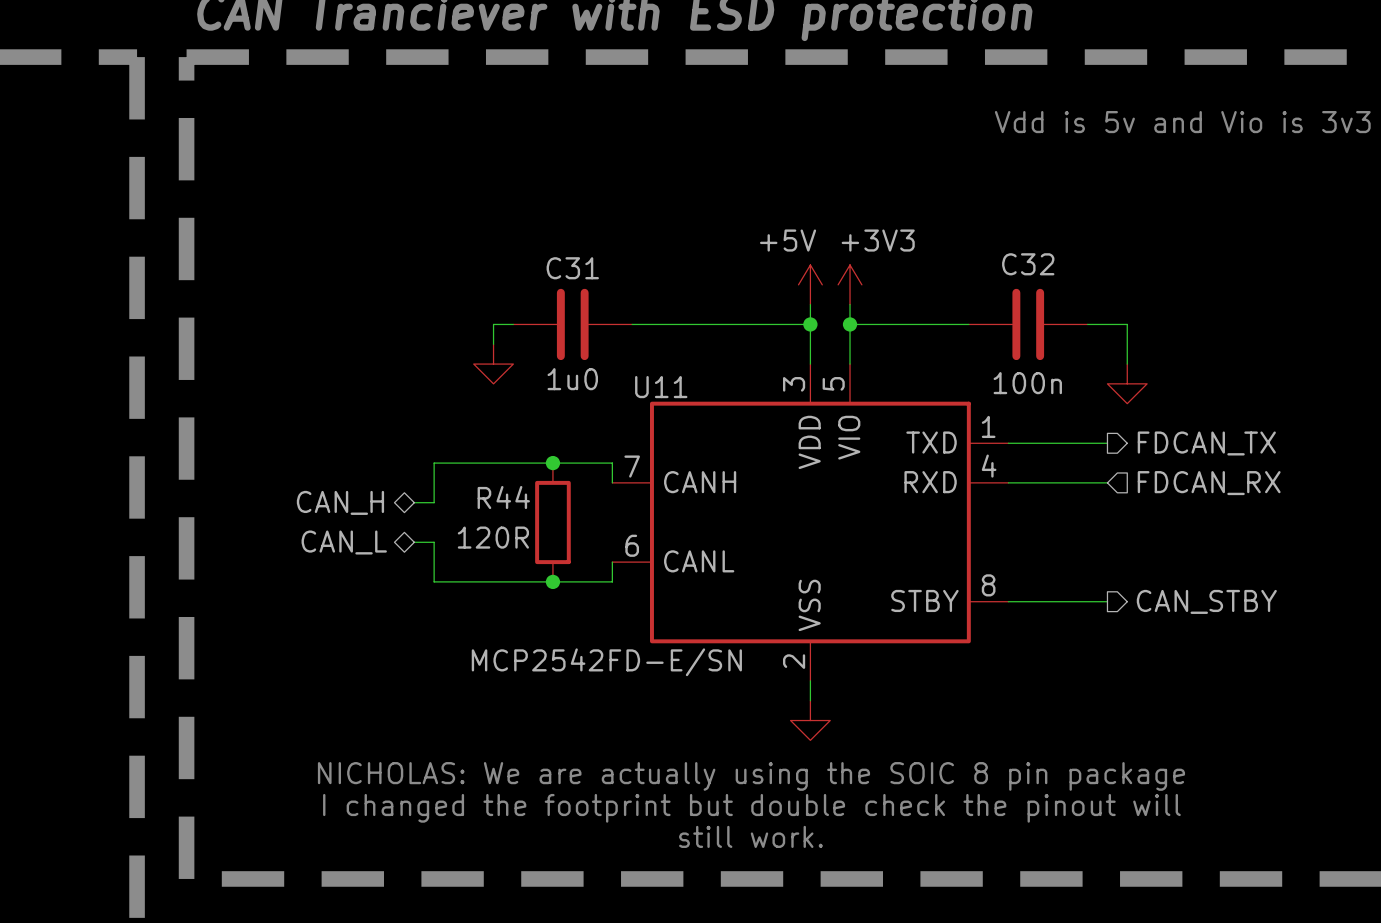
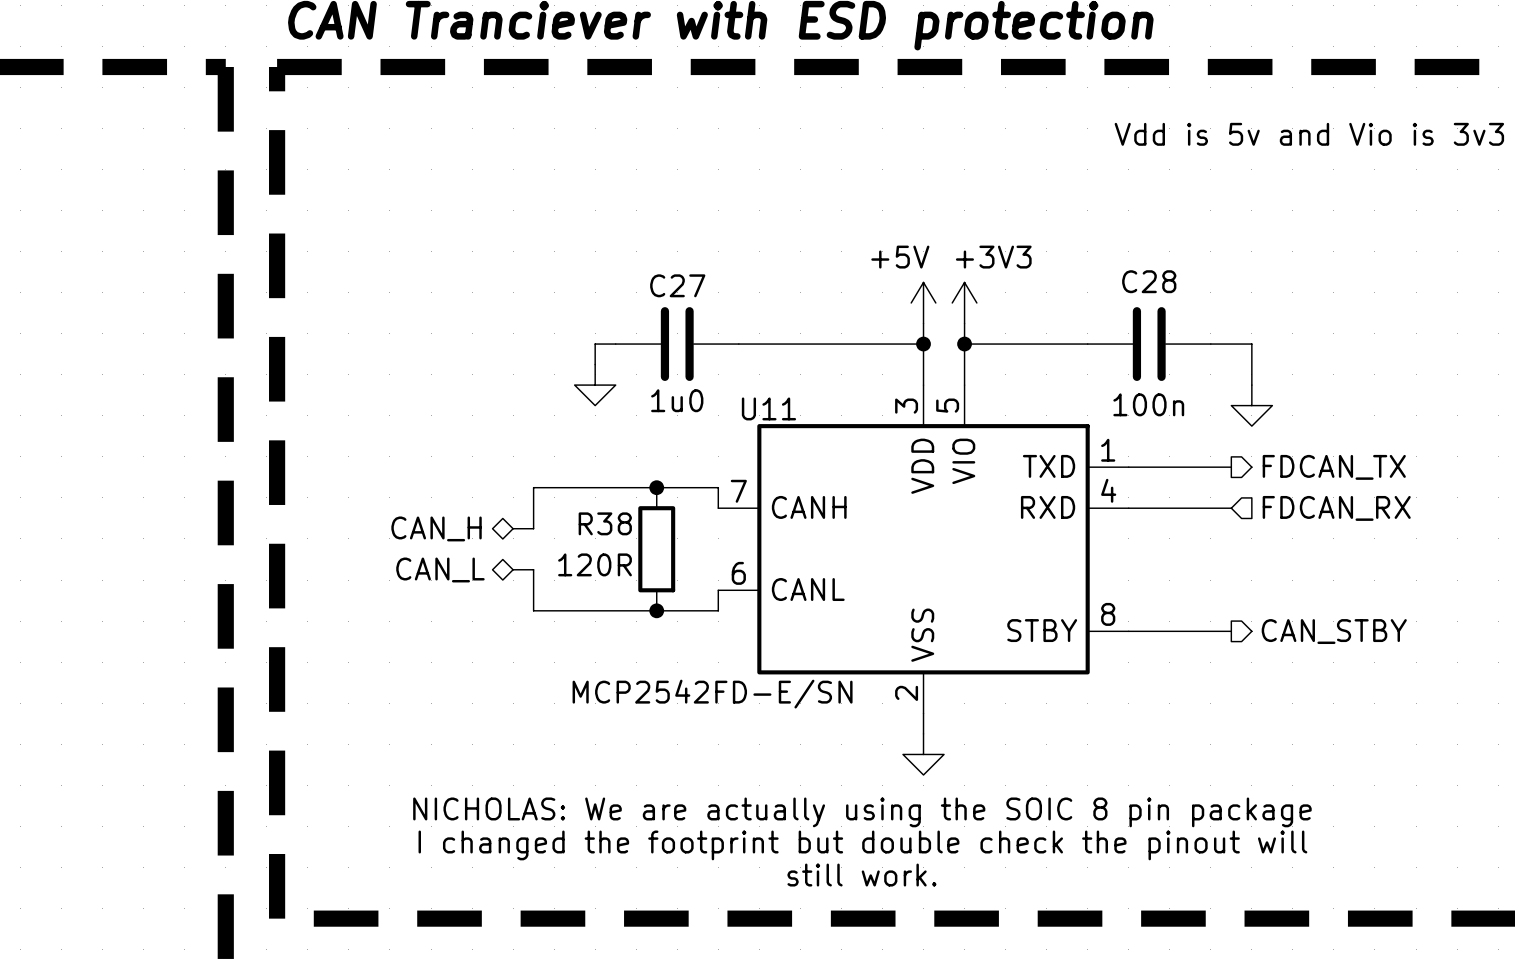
C32 name: C32 (1028, 264) -> C28 (1149, 281)
C31 name: C31 (572, 268) -> C27 (677, 285)
R44 name: R44 (503, 497) -> R38 (605, 523)

